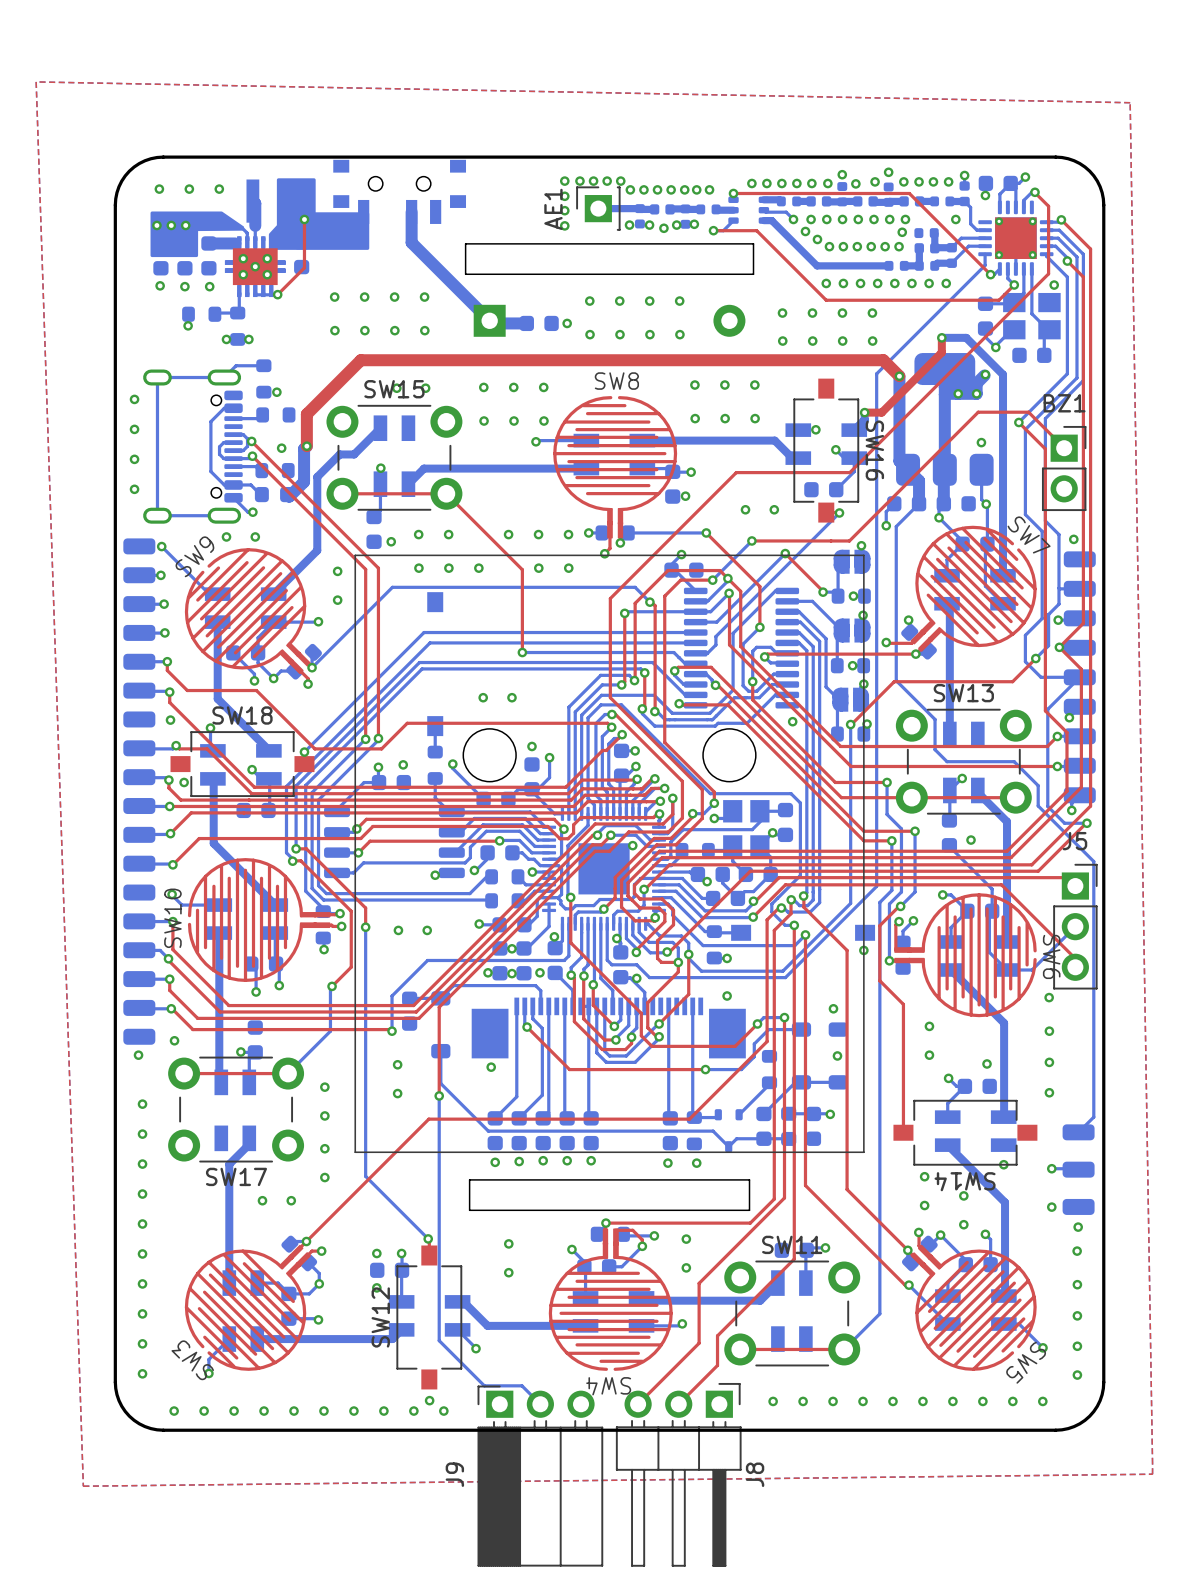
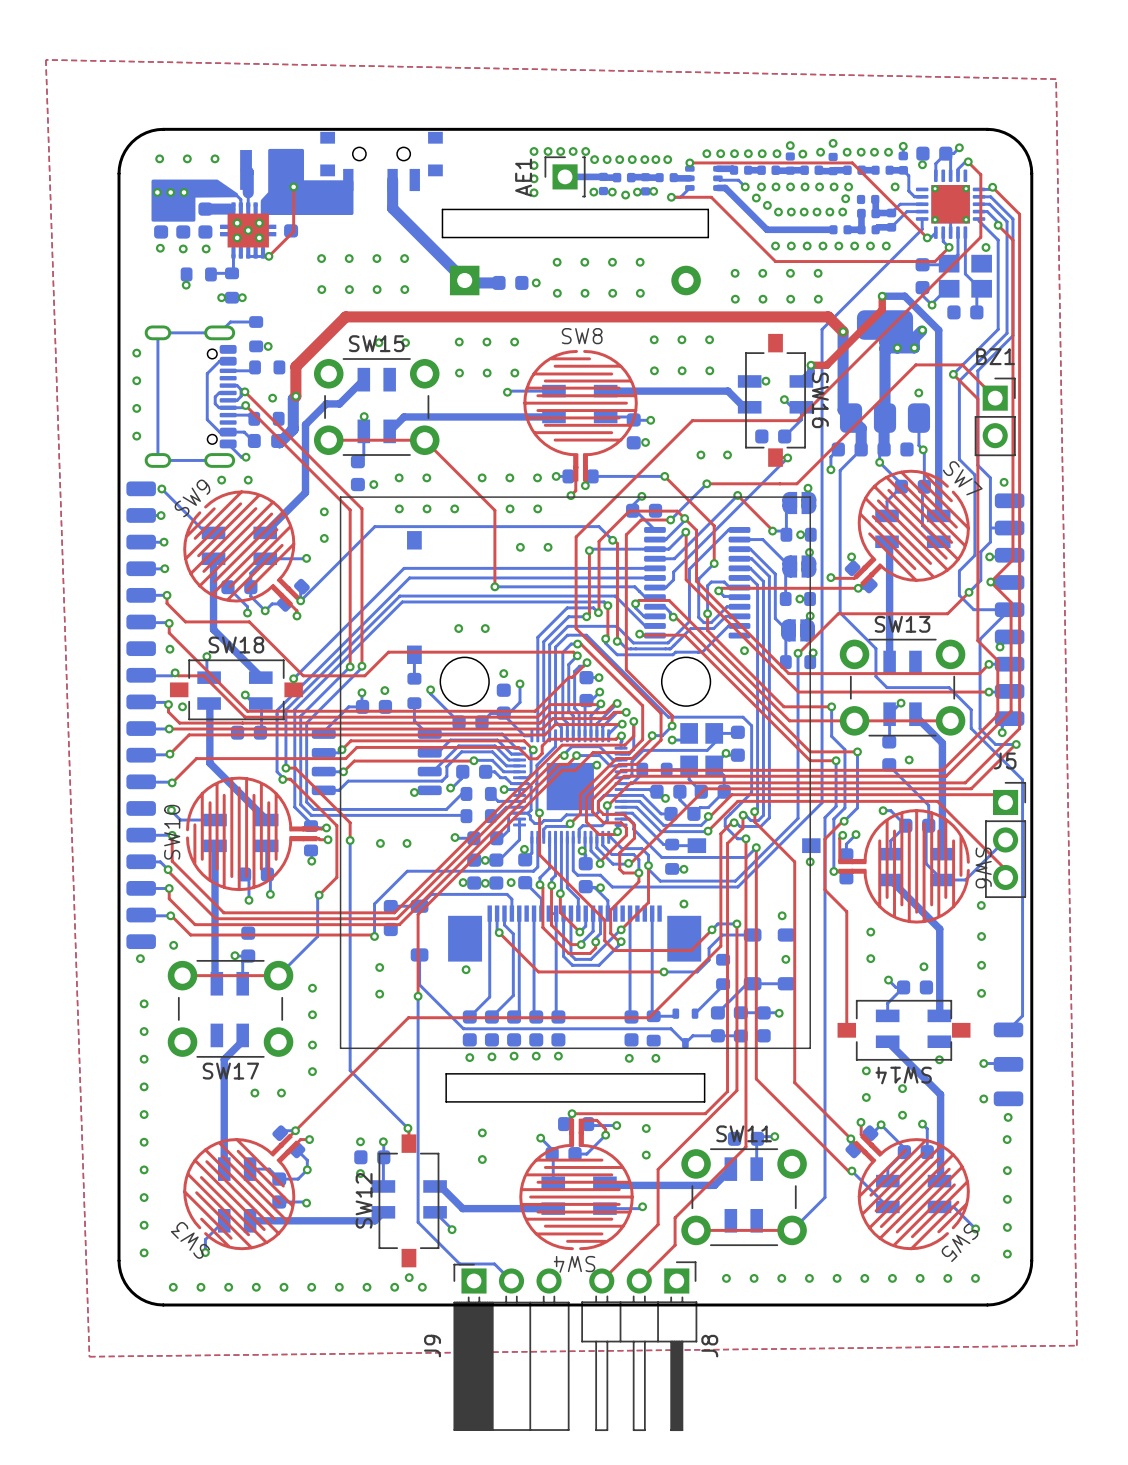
via: none -> (520, 547)
via: none -> (548, 547)

